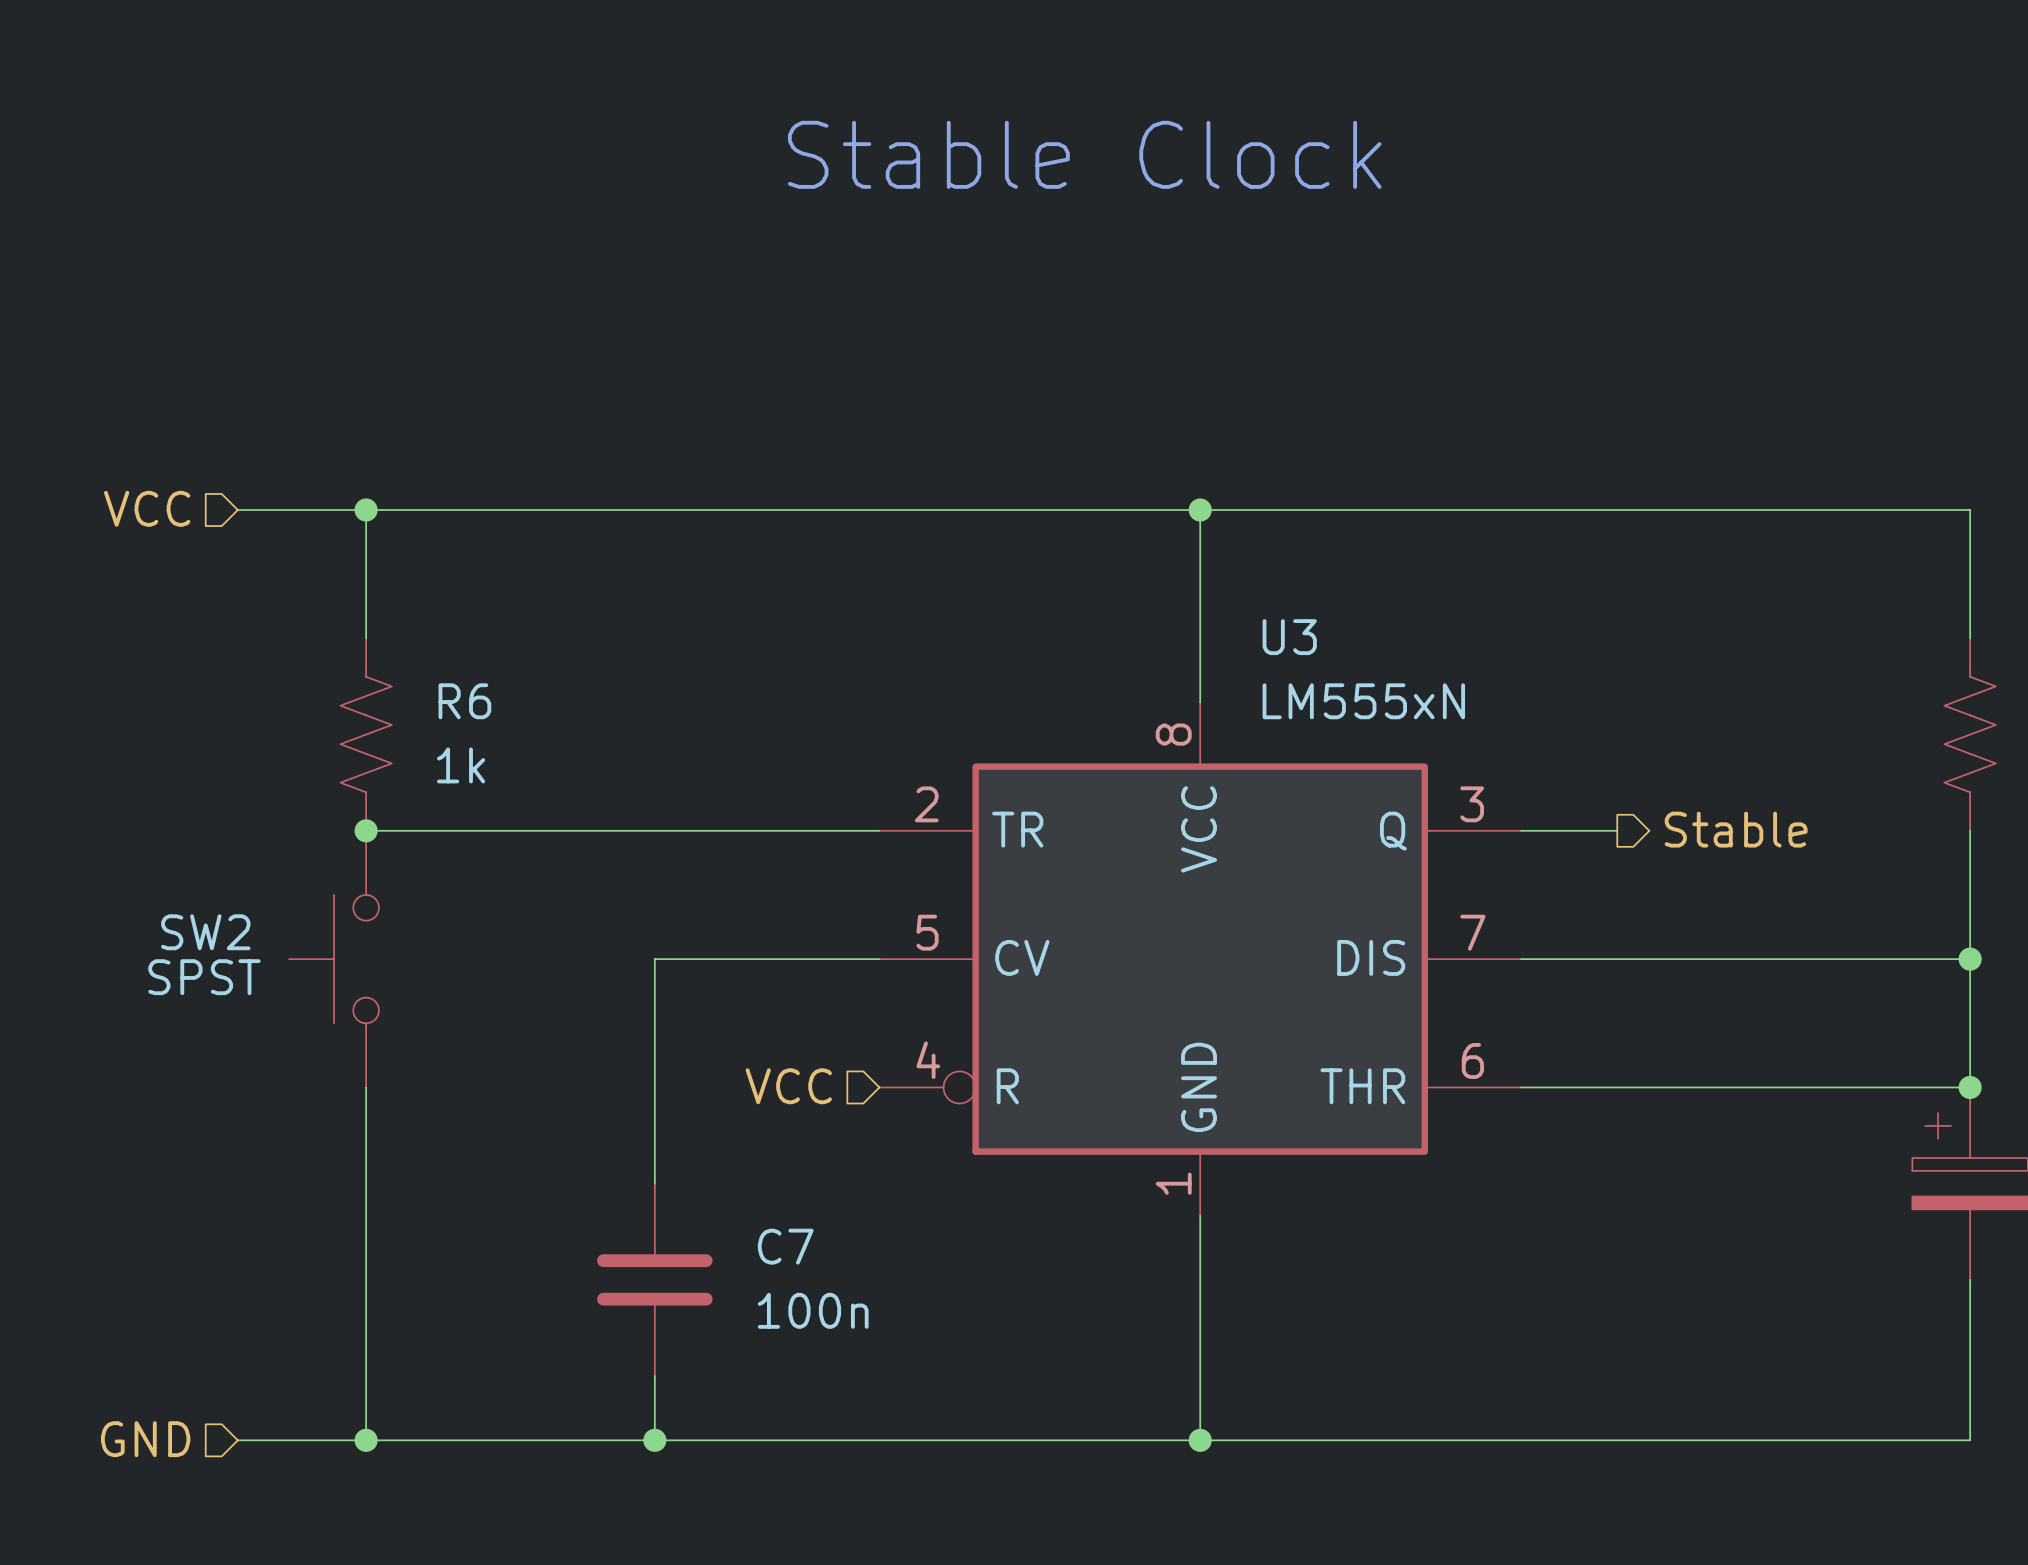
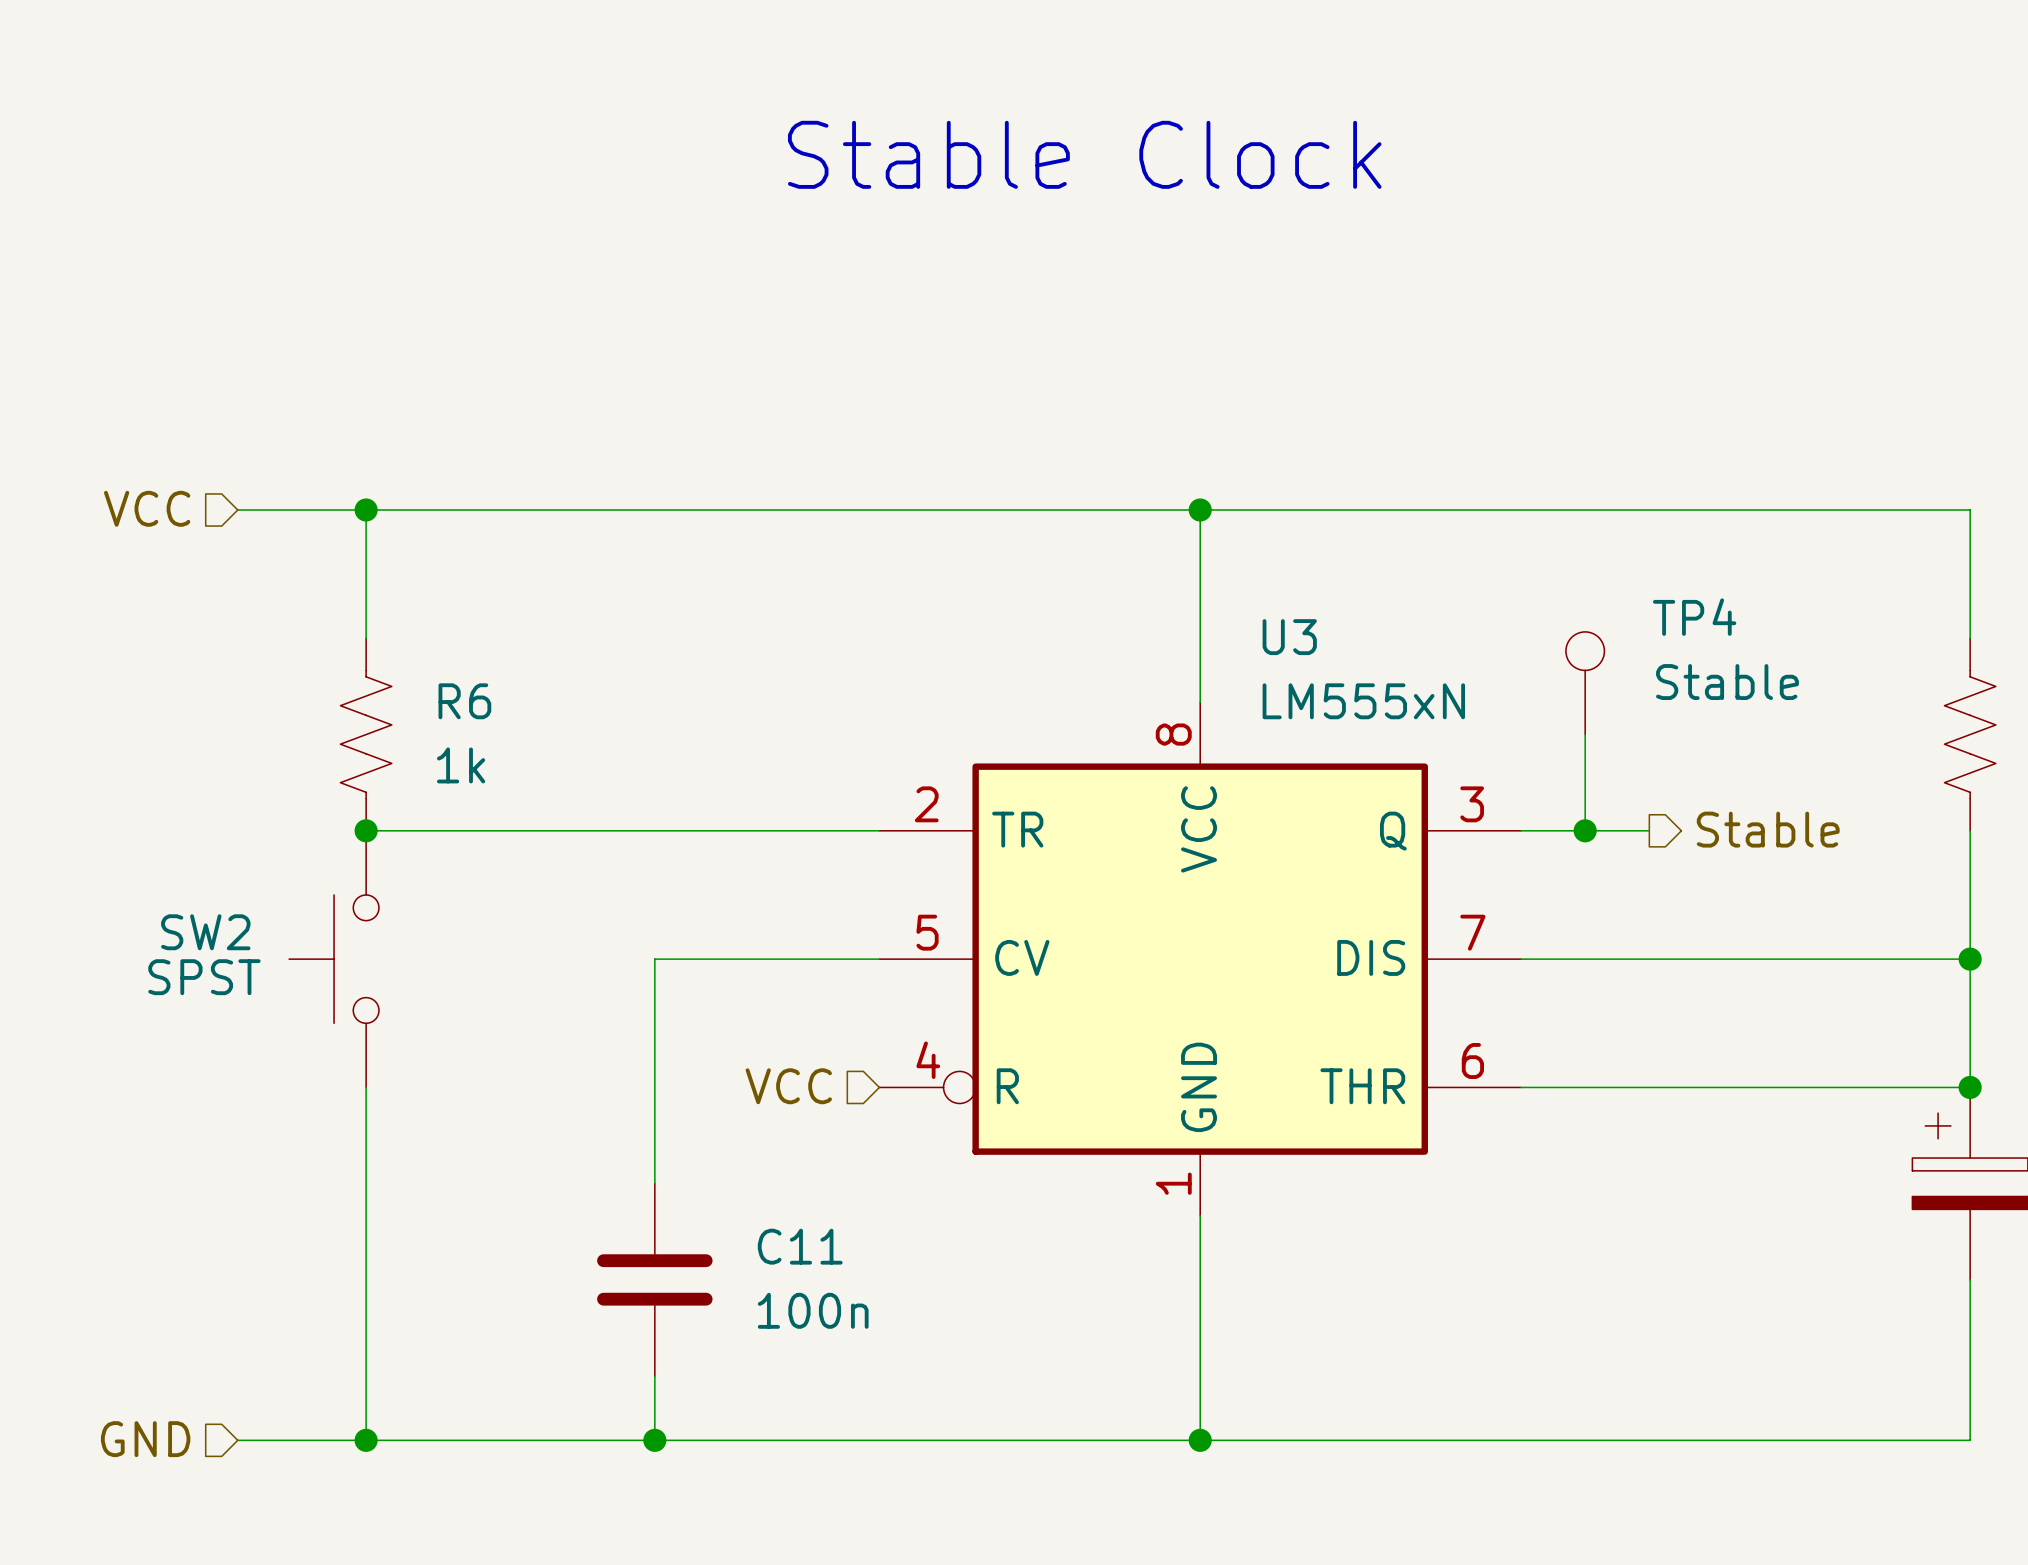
TP4: none -> Stable (1585, 683)
wire: none -> (1585, 734) (1585, 830)
hierarchical label position: Stable (1736, 829) -> Stable (1768, 829)
junction: none -> (1585, 830)
wire: none -> (1617, 830) (1649, 830)
C7 name: C7 (785, 1246) -> C11 (800, 1246)

